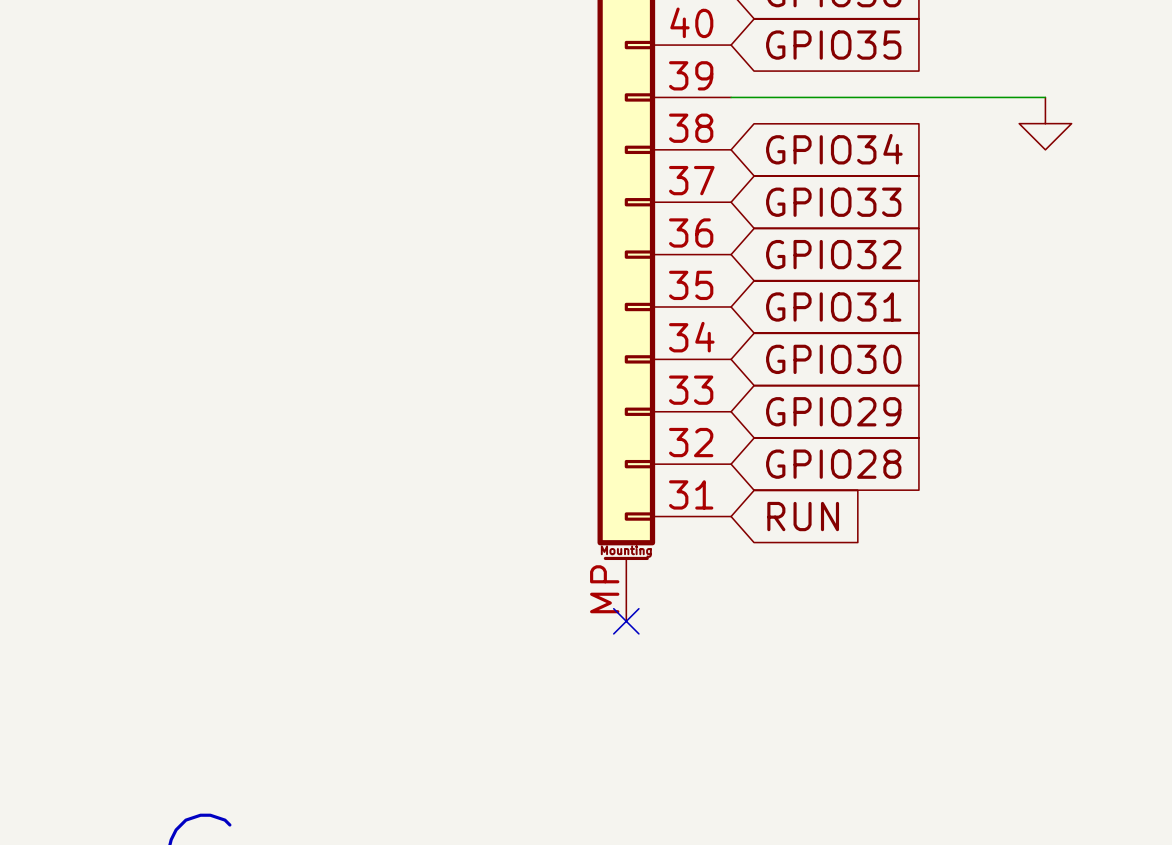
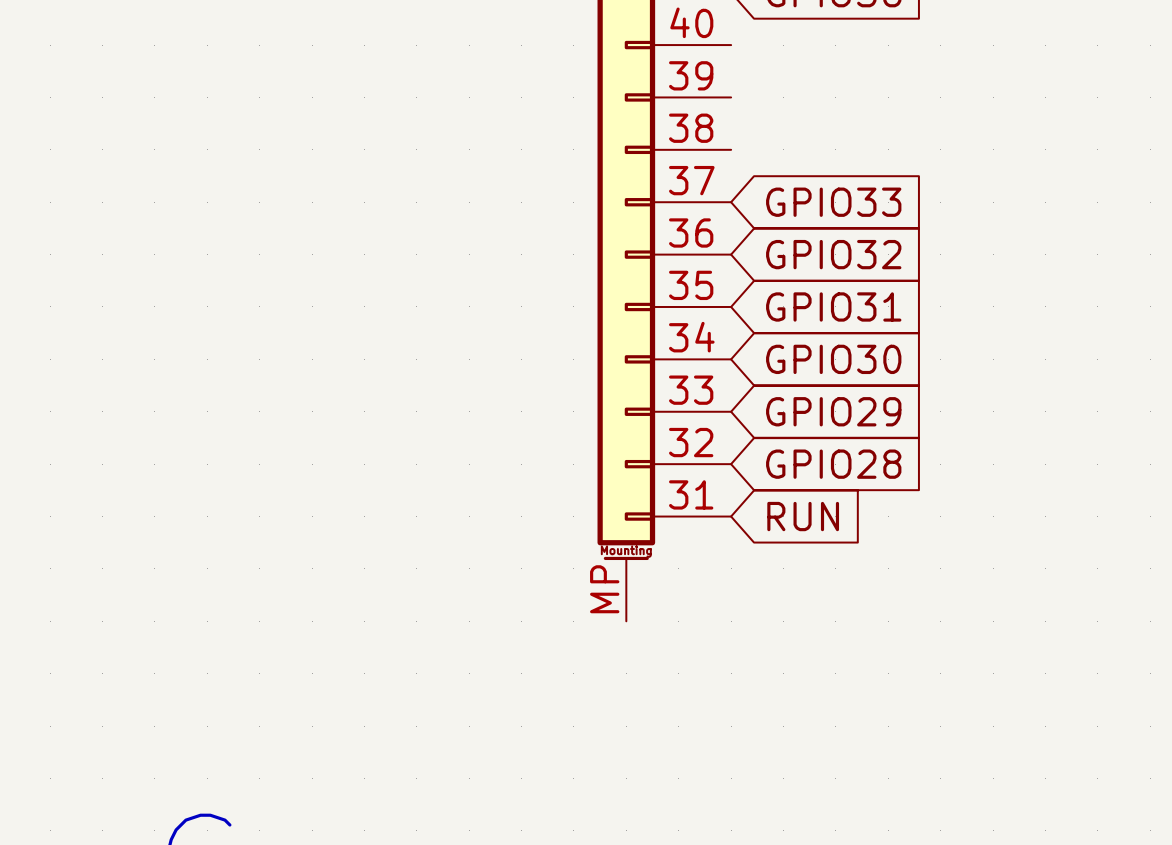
global label: GPIO35 (833, 45) -> none
wire: (731, 97) (1045, 97) -> none
power symbol: (1045, 123) -> none
global label: GPIO34 (834, 149) -> none
no-connect mark: (626, 621) -> none

